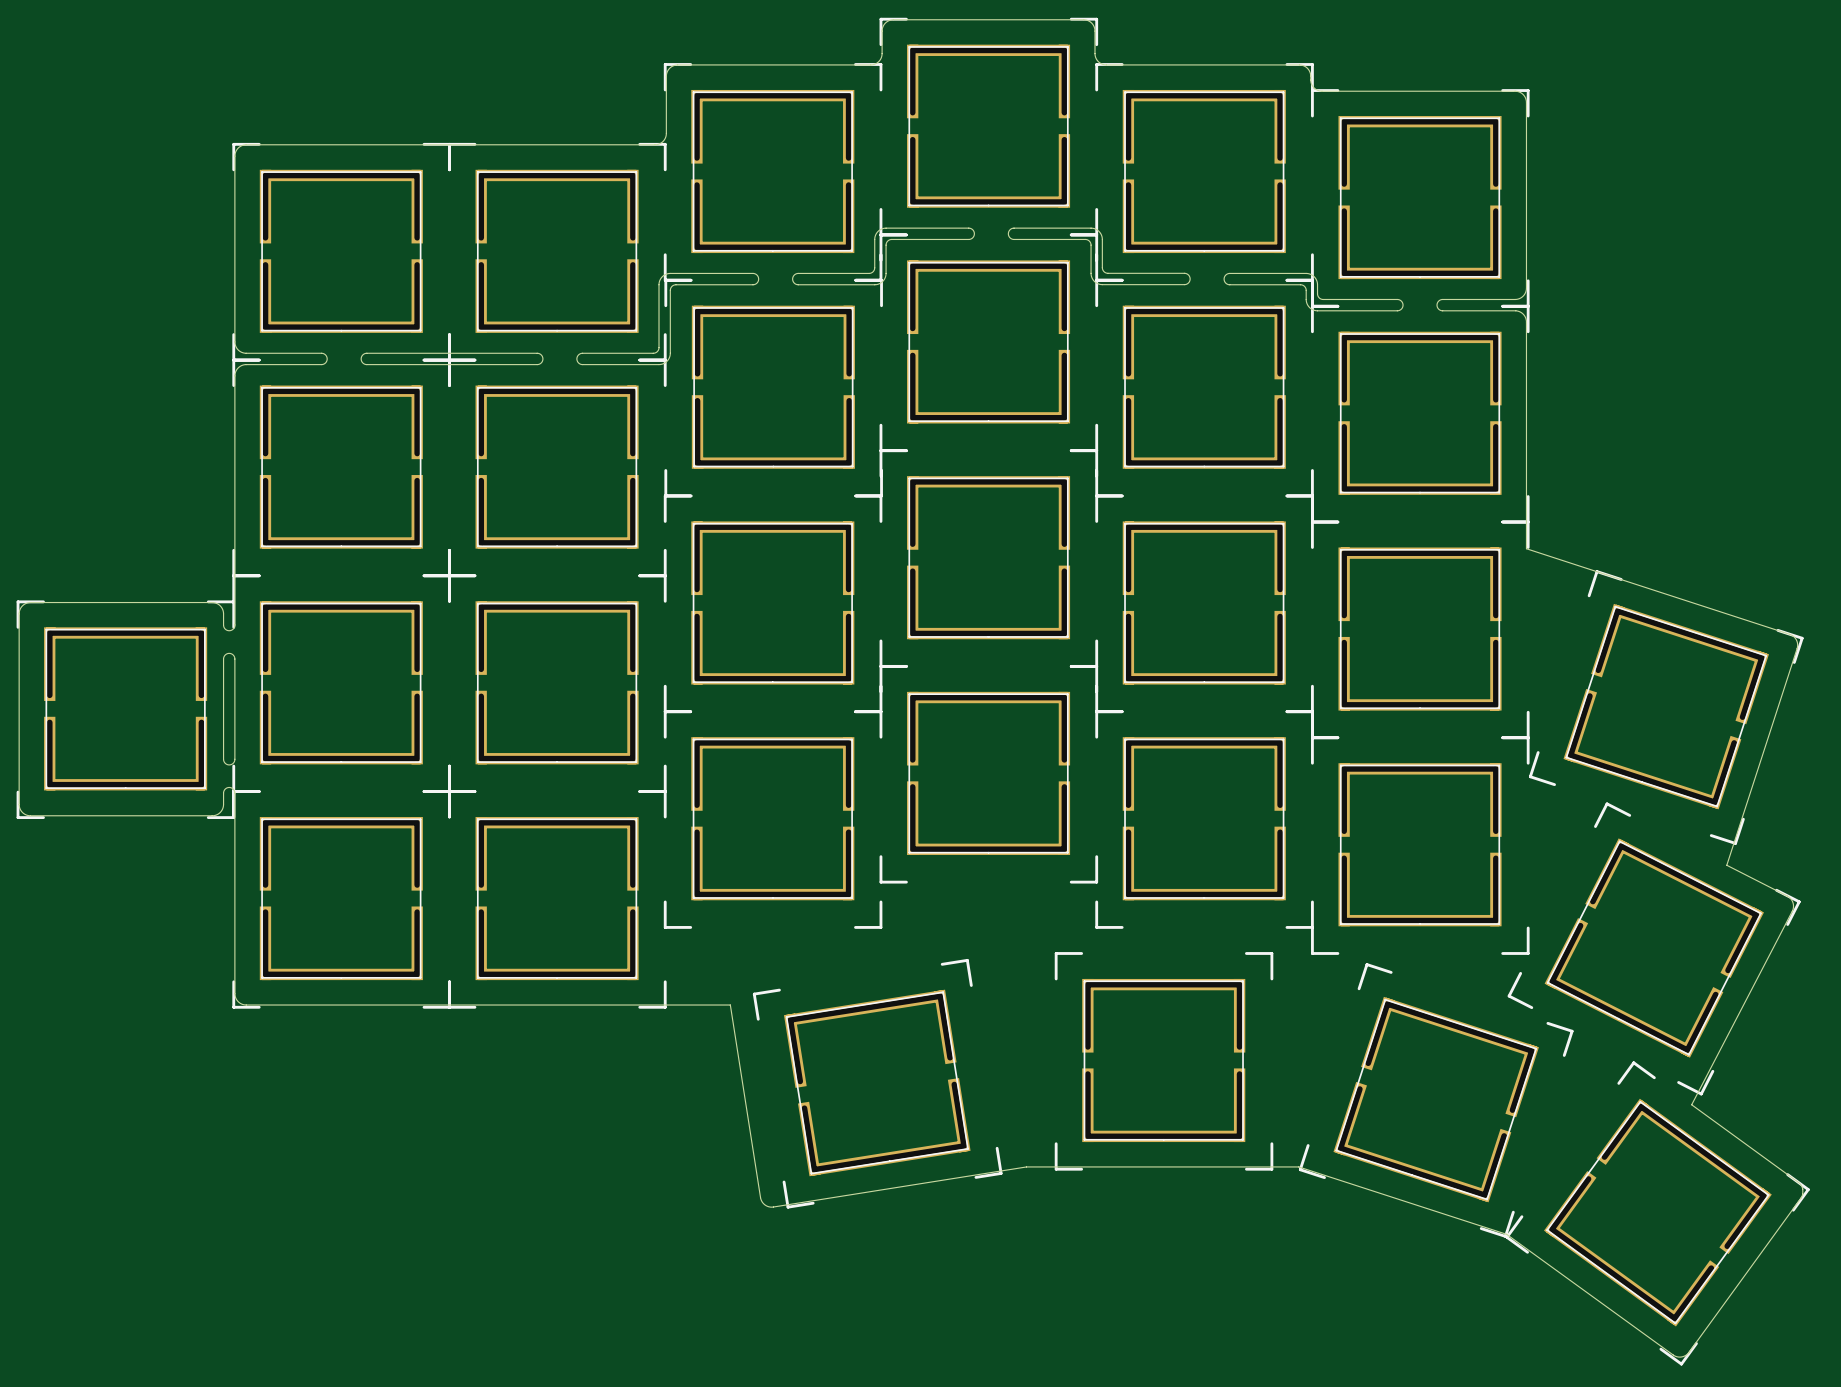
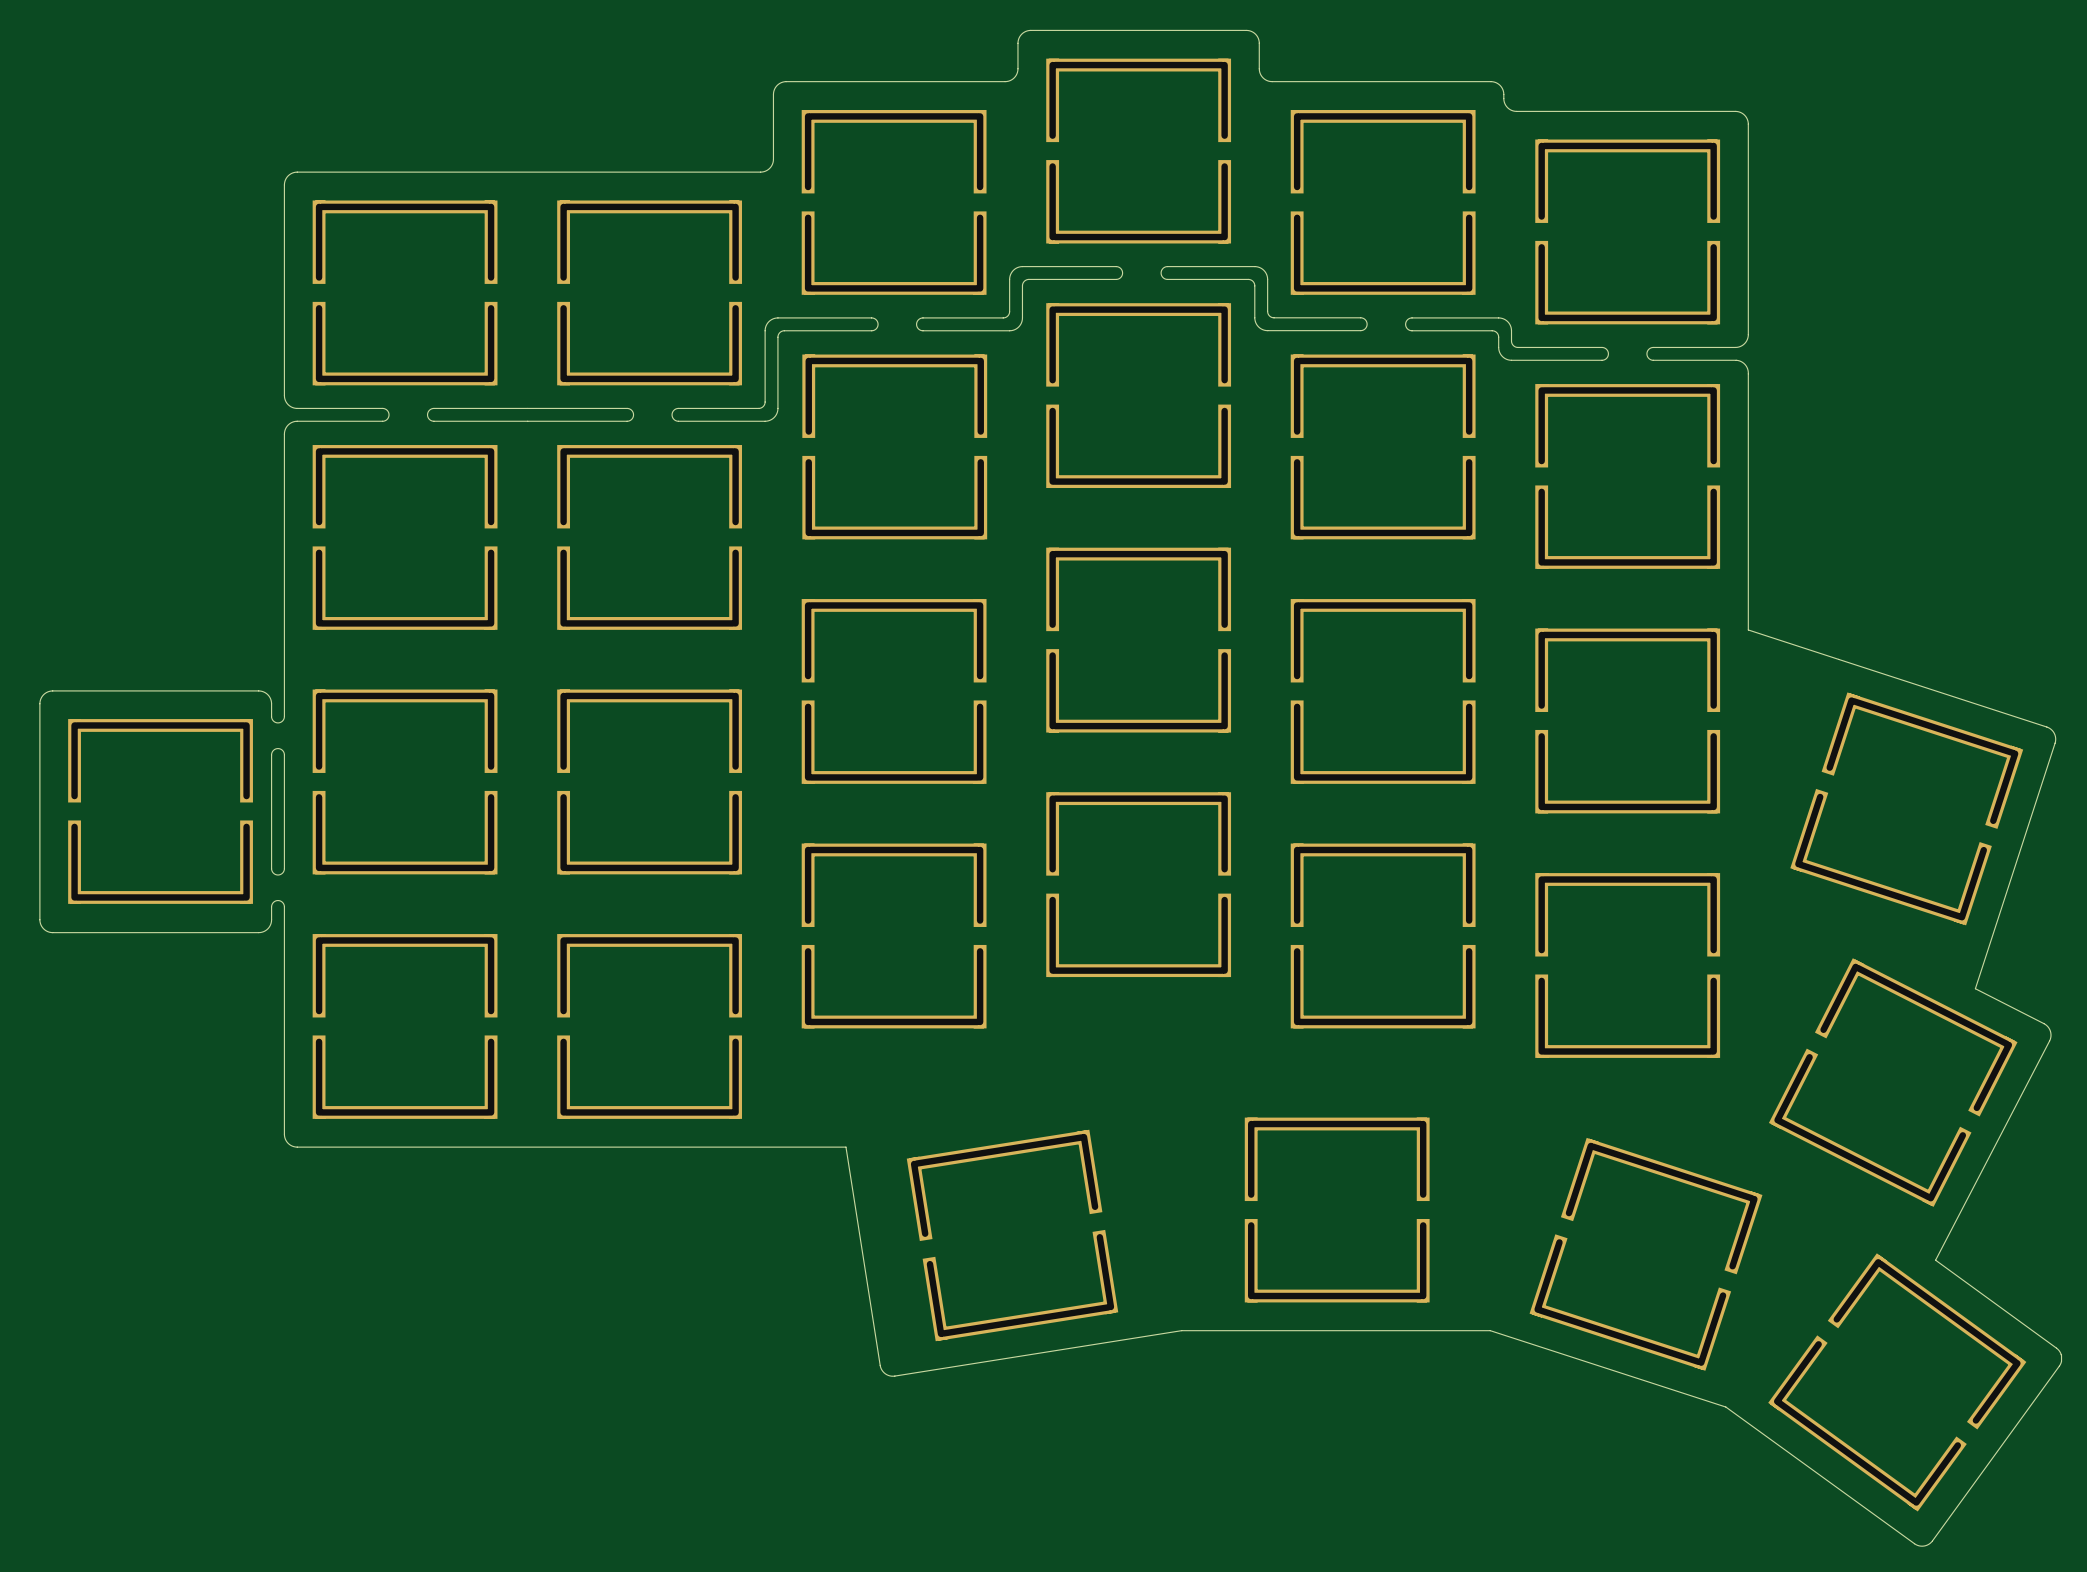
part footprint: [879, 17, 1099, 237] -> [1046, 58, 1232, 244]
part footprint: [663, 63, 883, 282] -> [801, 109, 987, 295]
part footprint: [1095, 63, 1314, 282] -> [1290, 109, 1476, 295]
part footprint: [1311, 89, 1530, 308] -> [1535, 139, 1721, 325]
part footprint: [232, 142, 451, 362] -> [312, 200, 498, 386]
part footprint: [448, 142, 667, 362] -> [557, 200, 743, 386]
part footprint: [879, 233, 1099, 453] -> [1046, 303, 1232, 489]
part footprint: [664, 278, 883, 498] -> [802, 354, 988, 540]
part footprint: [1095, 278, 1314, 498] -> [1290, 354, 1476, 540]
part footprint: [1311, 304, 1530, 524] -> [1535, 384, 1721, 569]
part footprint: [232, 358, 451, 578] -> [312, 445, 498, 630]
part footprint: [448, 358, 667, 578] -> [557, 445, 743, 630]
part footprint: [879, 449, 1099, 668] -> [1046, 547, 1232, 733]
part footprint: [663, 494, 883, 714] -> [801, 599, 987, 784]
part footprint: [1095, 494, 1314, 714] -> [1290, 599, 1476, 784]
part footprint: [1311, 520, 1530, 740] -> [1535, 628, 1721, 814]
part footprint: [1528, 570, 1804, 845] -> [1790, 692, 2024, 926]
part footprint: [232, 574, 451, 793] -> [312, 689, 498, 875]
part footprint: [448, 574, 667, 793] -> [557, 689, 743, 875]
part footprint: [16, 600, 236, 820] -> [68, 719, 253, 904]
part footprint: [879, 664, 1099, 884] -> [1046, 792, 1232, 978]
part footprint: [663, 710, 883, 929] -> [801, 843, 987, 1029]
part footprint: [1095, 710, 1314, 929] -> [1290, 843, 1476, 1029]
part footprint: [1311, 736, 1530, 955] -> [1535, 873, 1721, 1058]
part footprint: [232, 790, 451, 1009] -> [312, 934, 498, 1119]
part footprint: [448, 790, 667, 1009] -> [557, 934, 743, 1119]
part footprint: [1507, 802, 1801, 1096] -> [1768, 958, 2018, 1207]
part footprint: [1054, 952, 1274, 1171] -> [1244, 1117, 1430, 1303]
part footprint: [752, 958, 1003, 1209] -> [906, 1129, 1119, 1342]
part footprint: [1298, 963, 1574, 1238] -> [1529, 1137, 1763, 1371]
part footprint: [1505, 1061, 1810, 1366] -> [1768, 1253, 2027, 1512]

